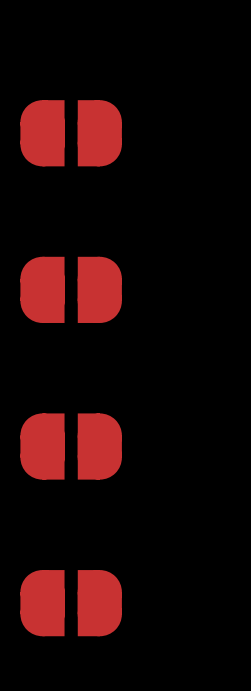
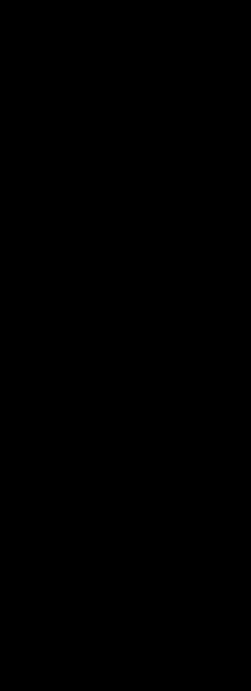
part: (71, 133) -> none
part: (71, 289) -> none
part: (71, 446) -> none
part: (71, 603) -> none

